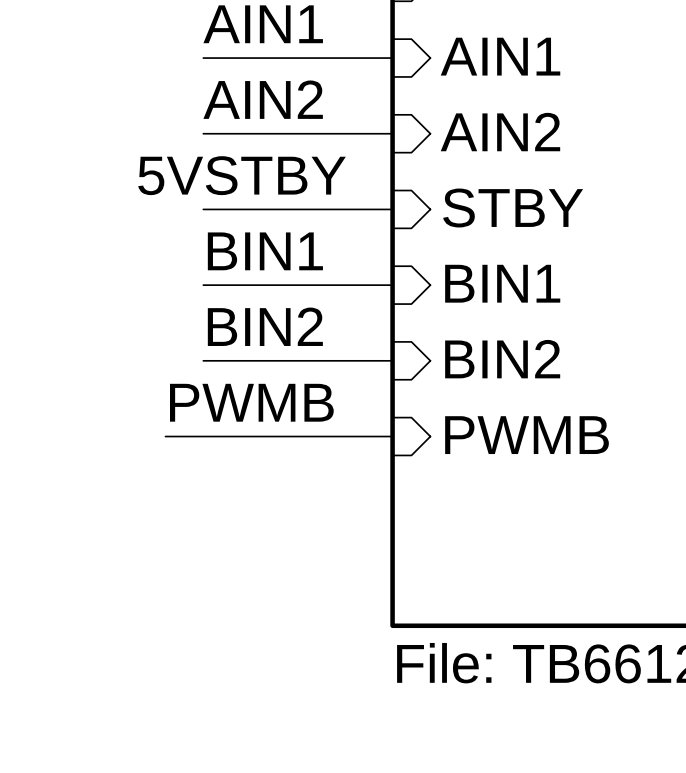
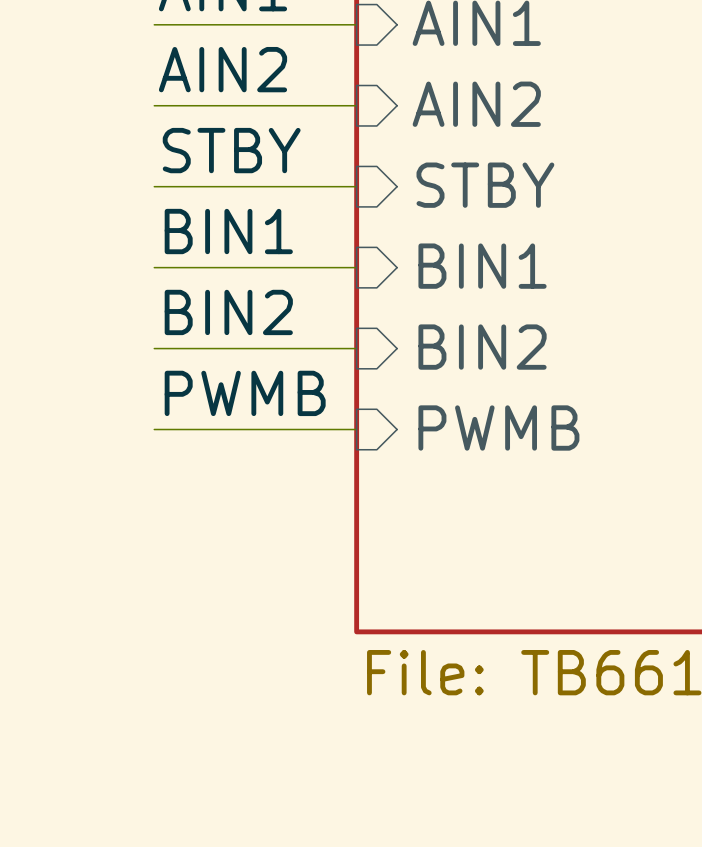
label: 5V (170, 175) -> none
label position: PWMB (251, 402) -> PWMB (245, 393)
wire: (165, 436) (203, 436) -> none

